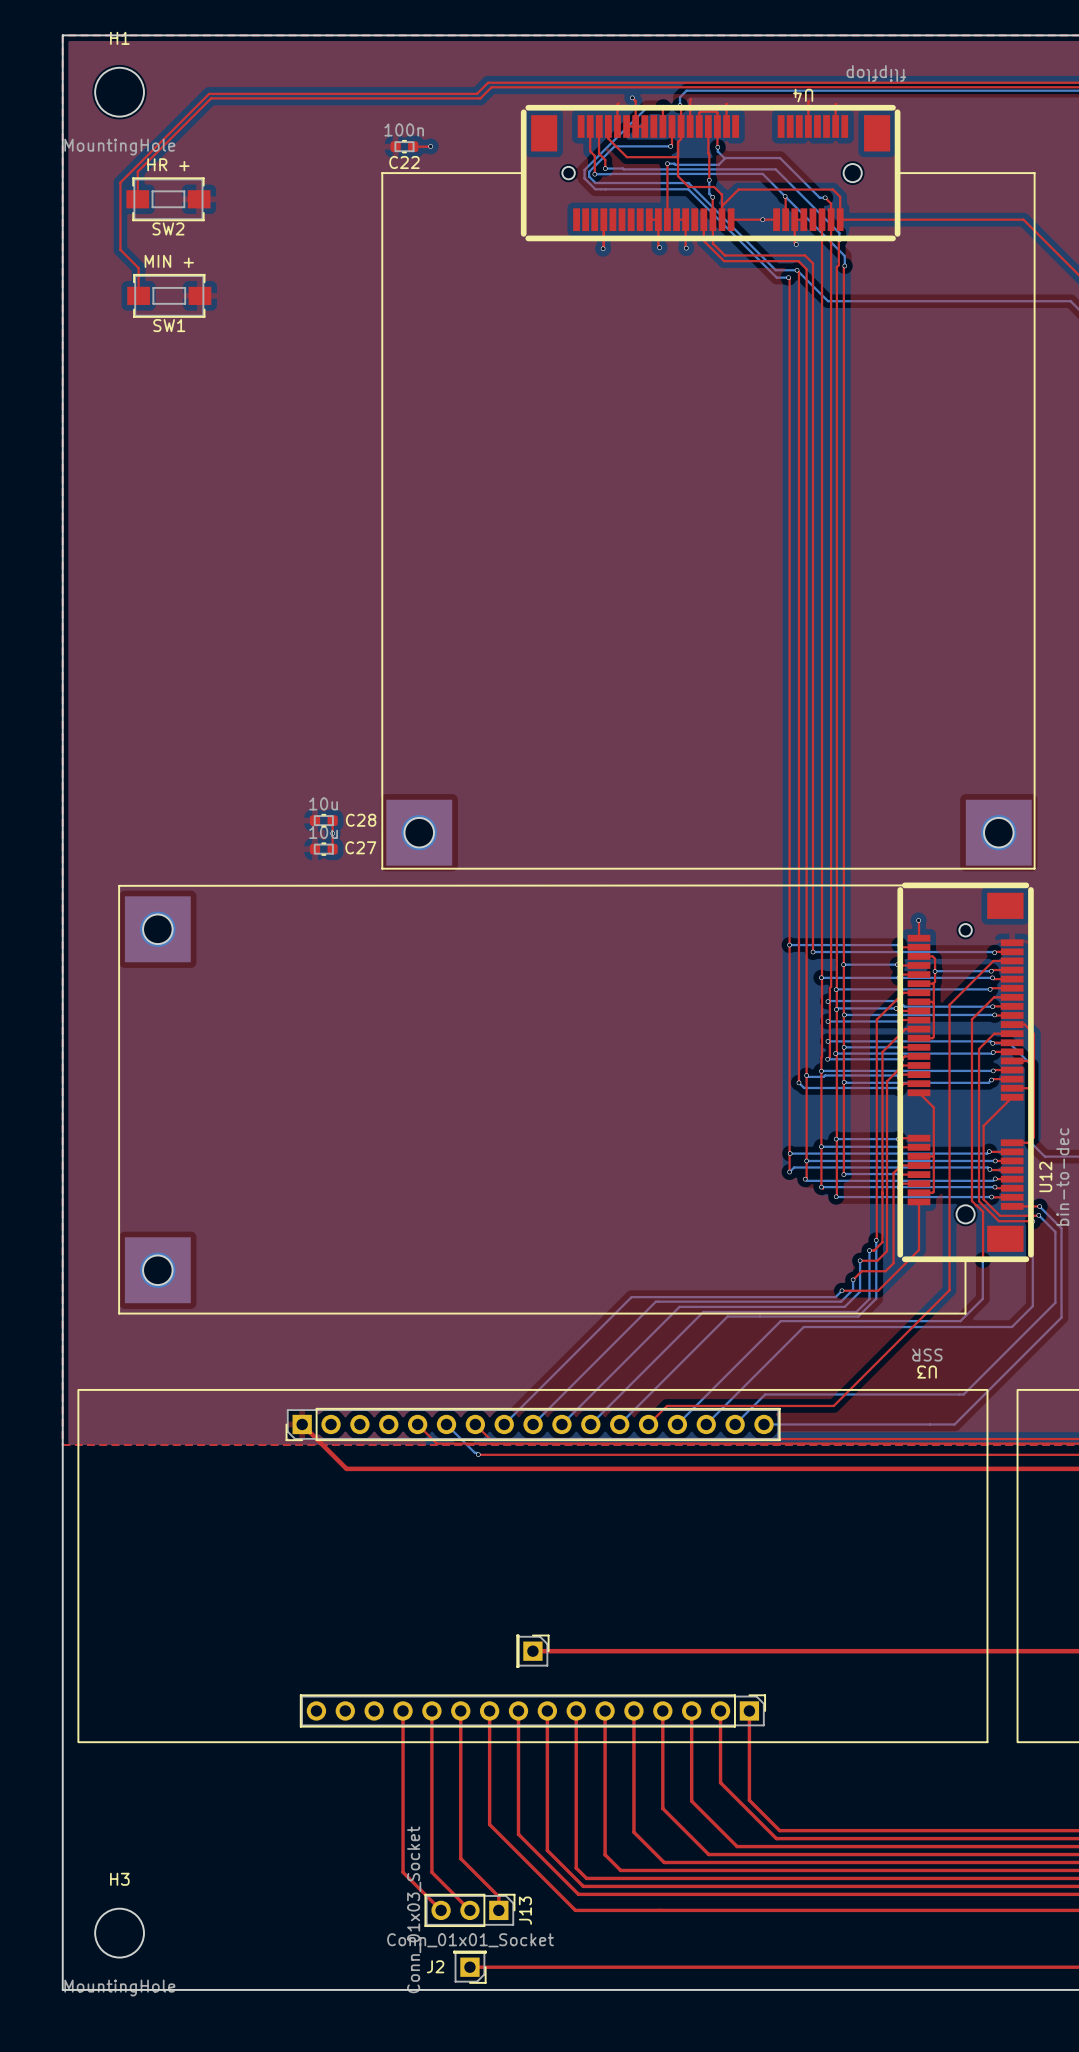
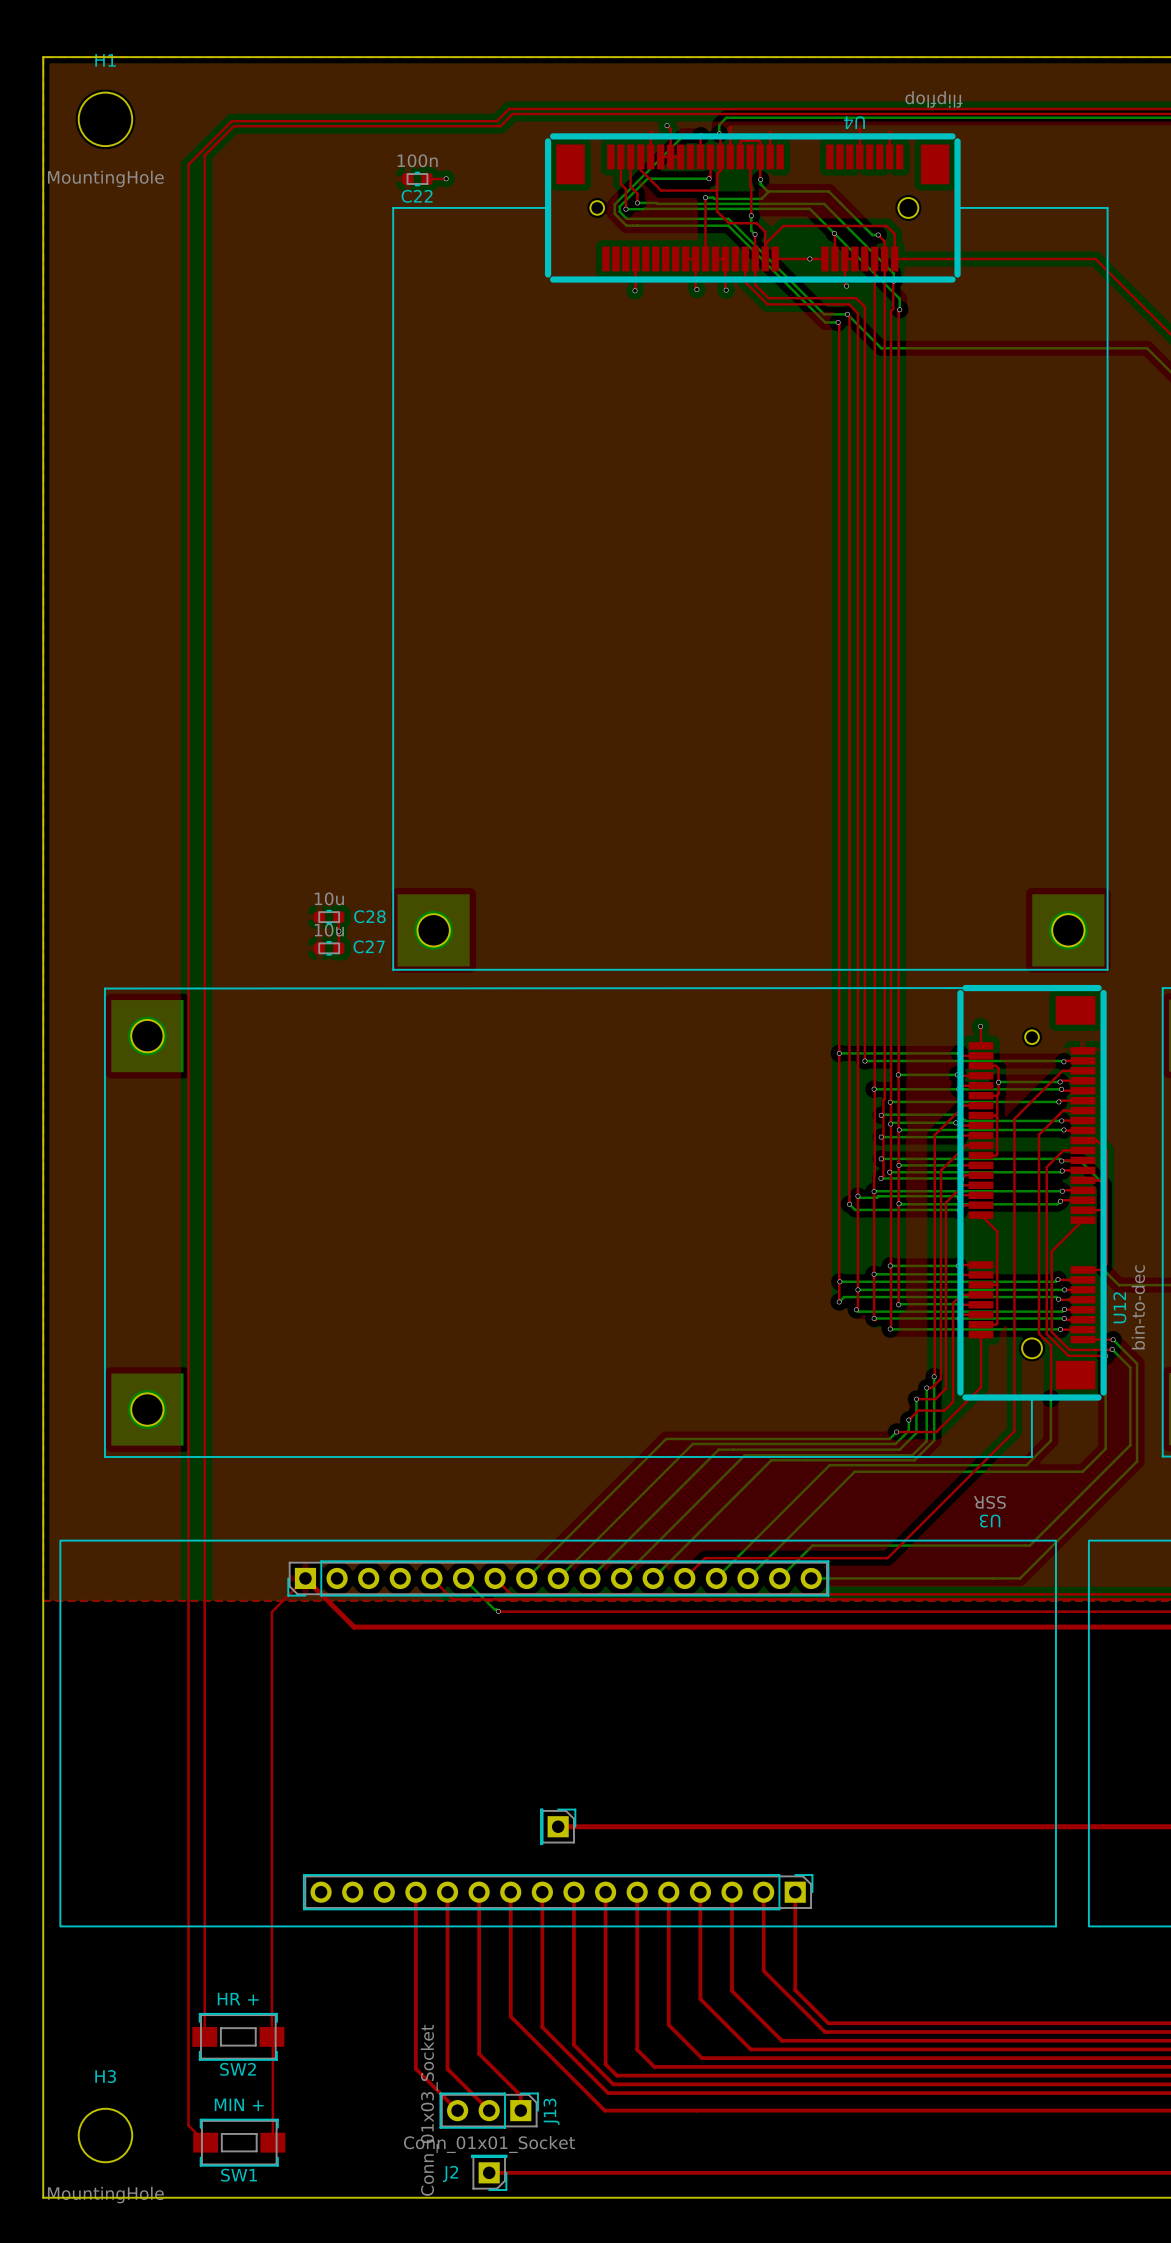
top track: (235, 93) (209, 93) (120, 182) (120, 249) (138, 268) (138, 295) -> (231, 121) (188, 164) (188, 2125) (205, 2142)
top track: (236, 98) (211, 98) (137, 171) (137, 199) -> (233, 126) (204, 155) (204, 2036)
SW2 position: (168, 199) -> (238, 2036)
SW1 position: (169, 295) -> (239, 2142)
top track: none -> (305, 1578) (271, 1611) (272, 2142)

